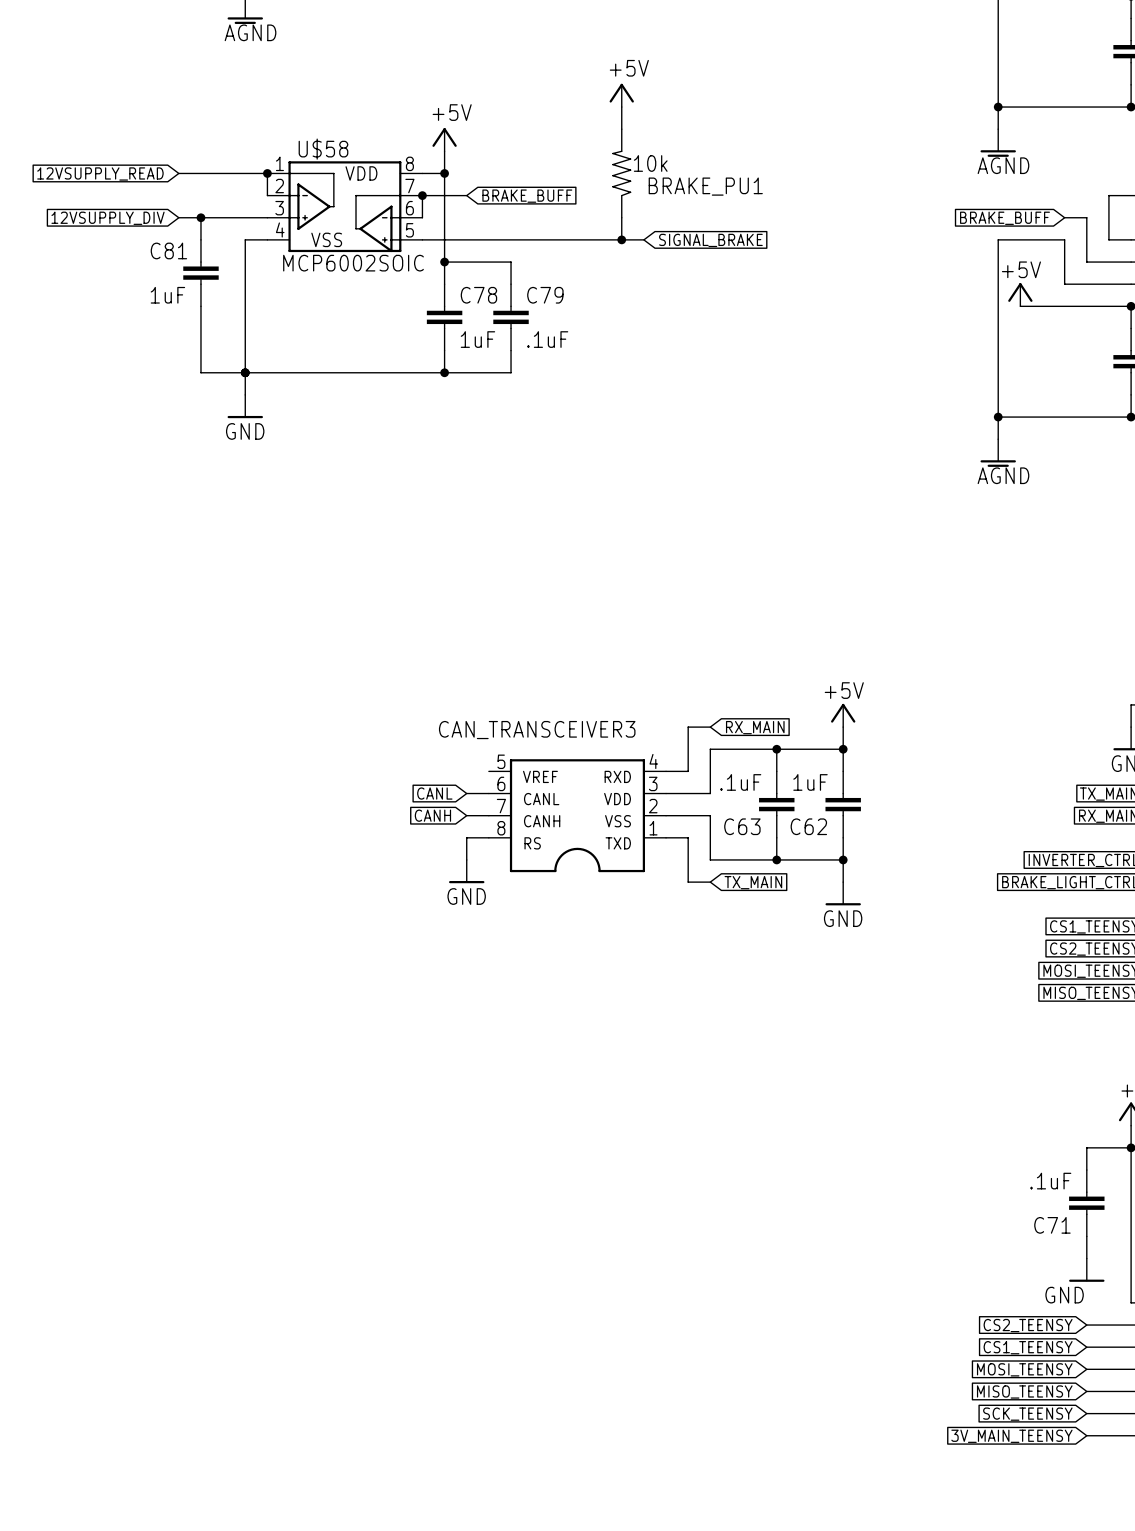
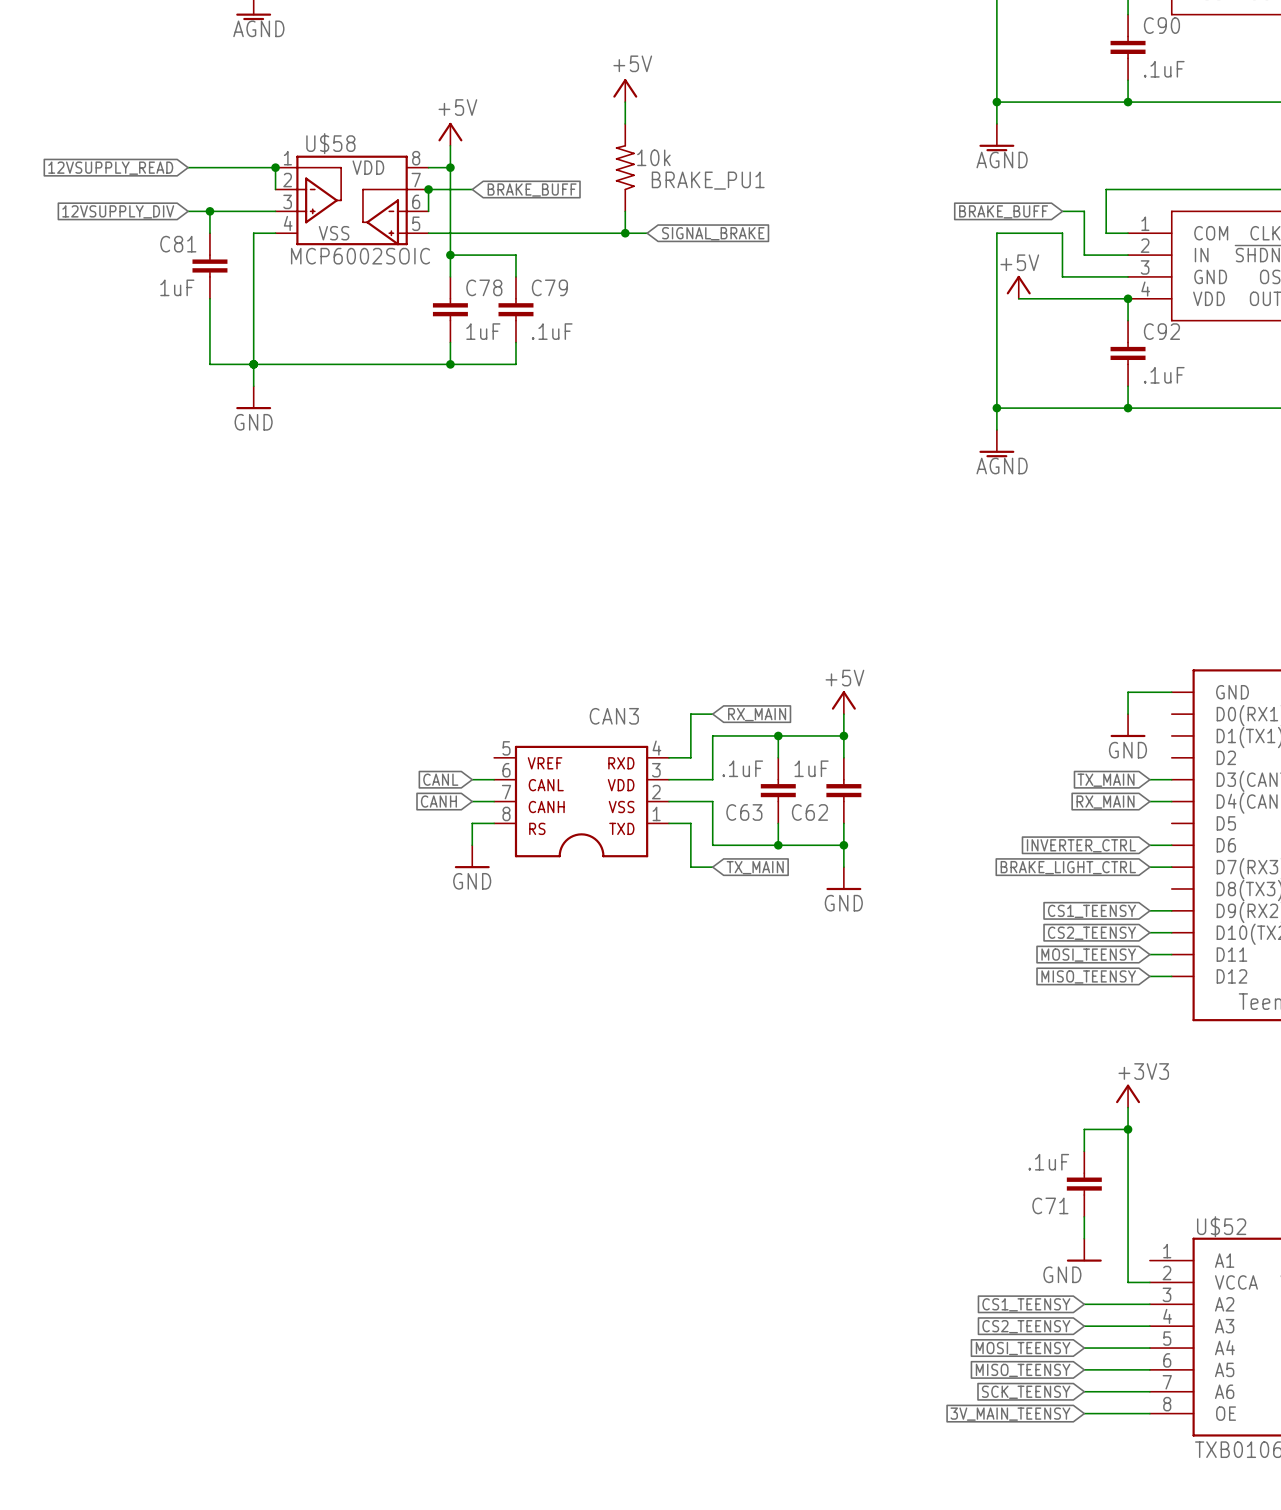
CAN_TRANSCEIVER3 name: CAN_TRANSCEIVER3 (537, 730) -> CAN3 (614, 716)
global label: CS2_TEENSY (1028, 1325) -> CS1_TEENSY (1026, 1304)
global label: CS1_TEENSY (1028, 1347) -> CS2_TEENSY (1026, 1326)

